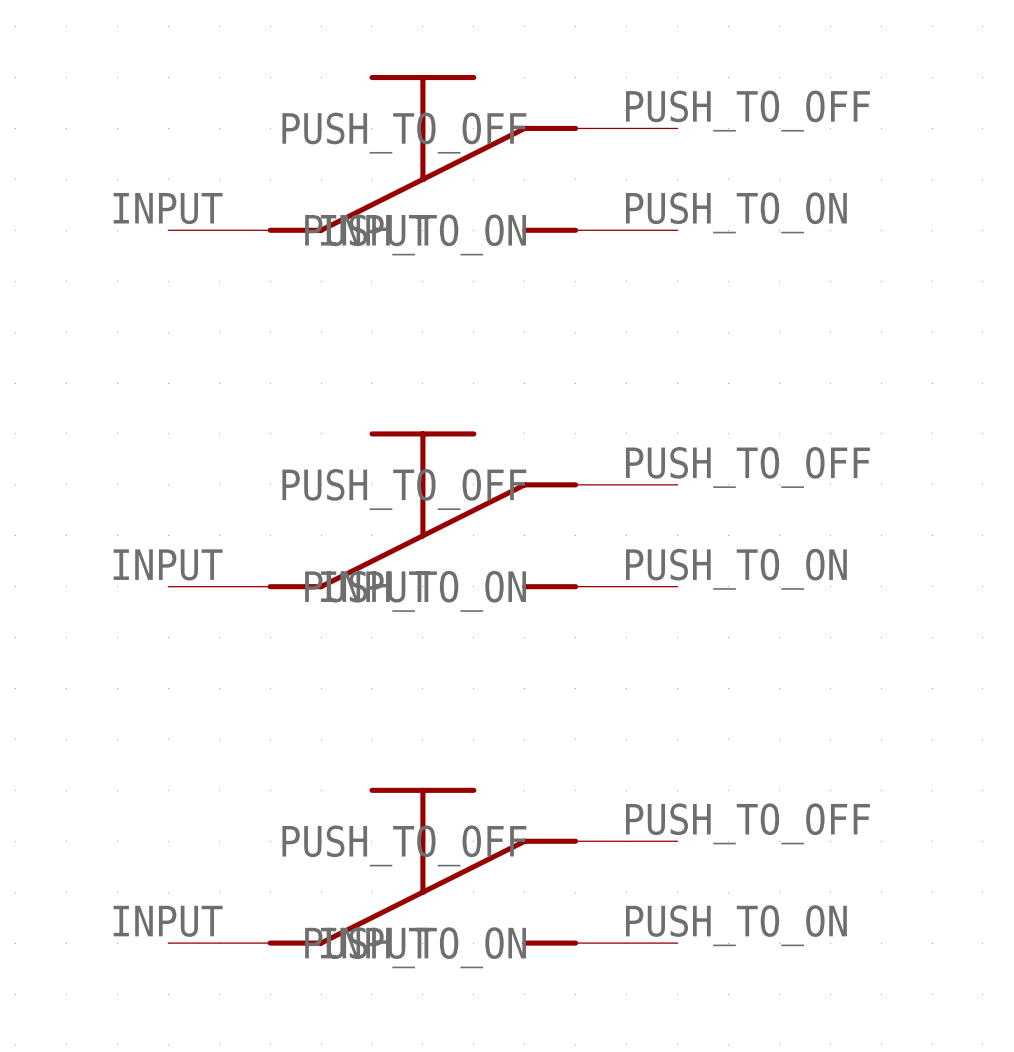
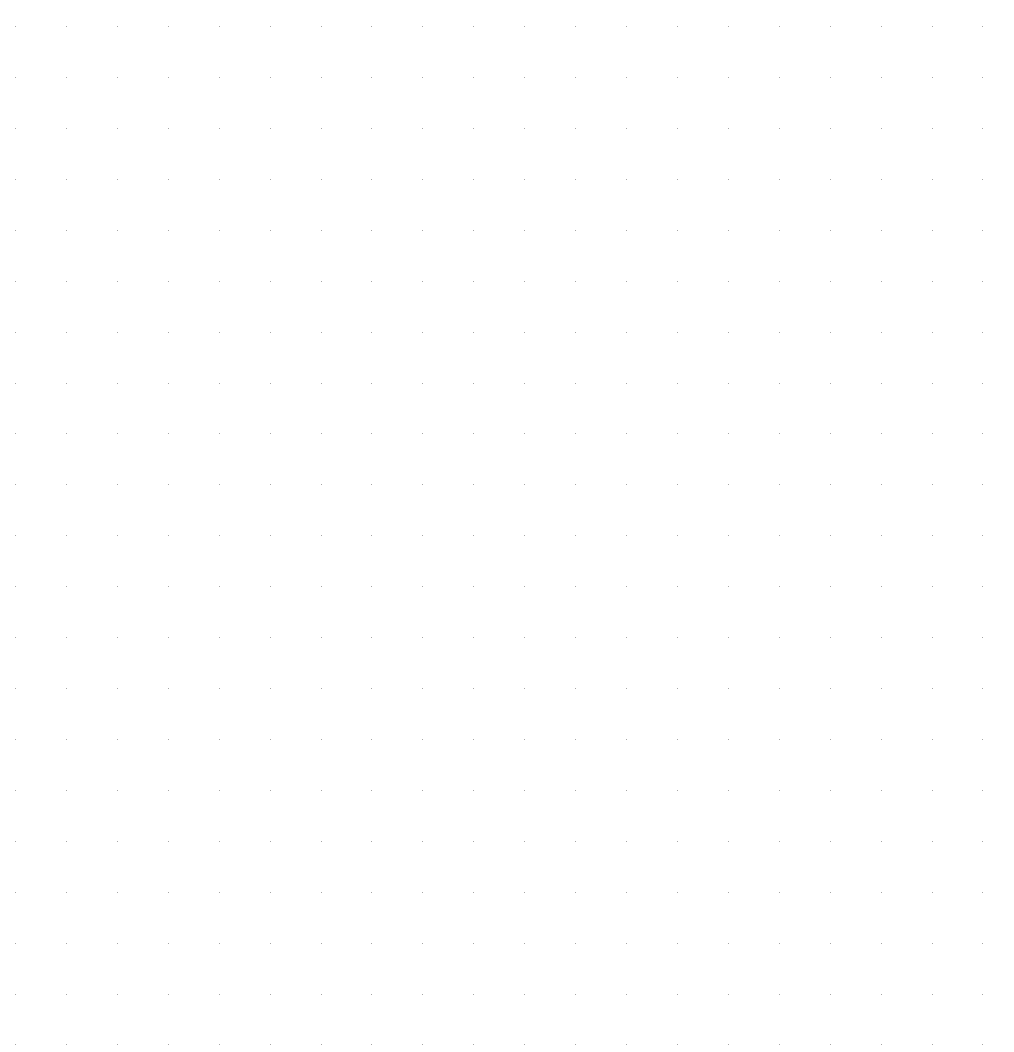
part: (422, 153) -> none
part: (422, 510) -> none
part: (422, 866) -> none

